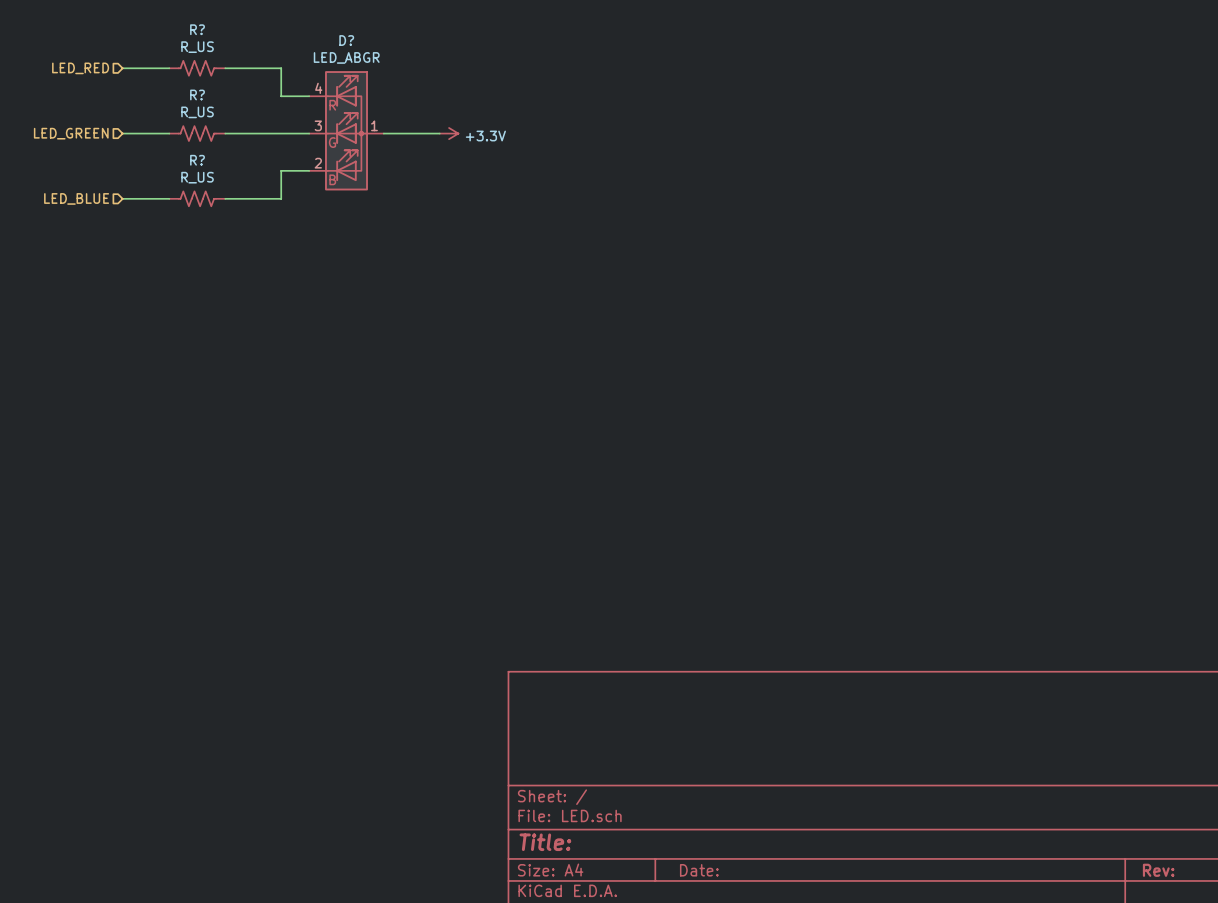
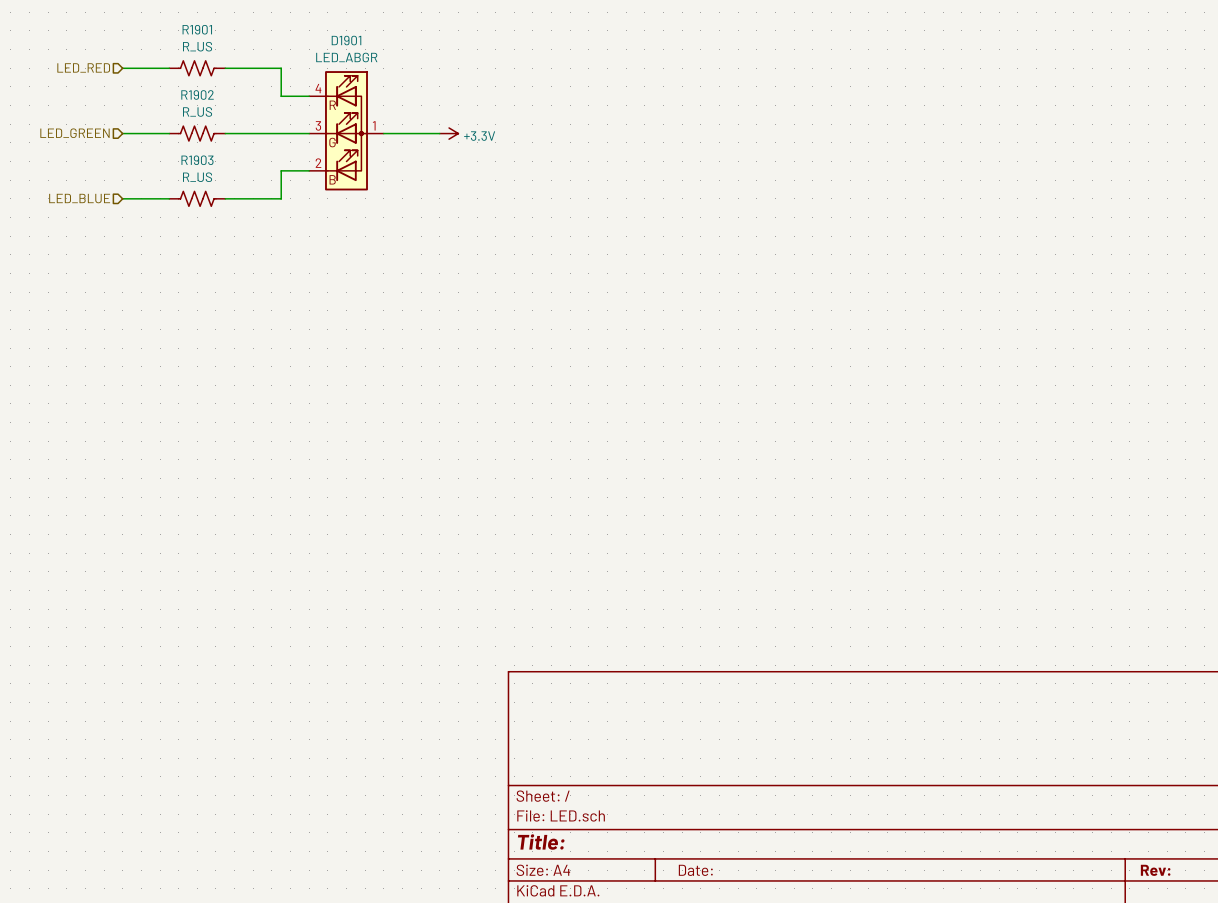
R? name: R? (197, 29) -> R1901 (197, 29)
D? name: D? (346, 40) -> D1901 (346, 40)
R? name: R? (197, 94) -> R1902 (197, 94)
R? name: R? (197, 160) -> R1903 (197, 160)

